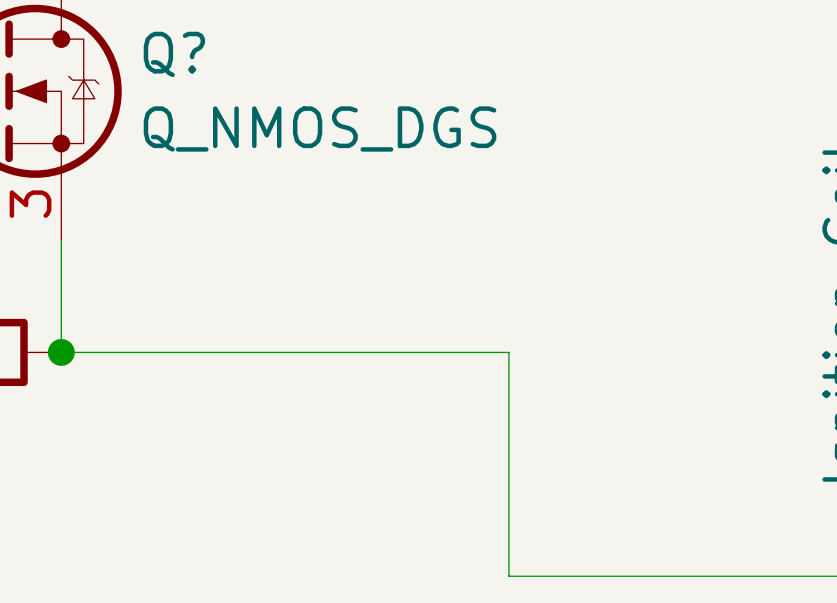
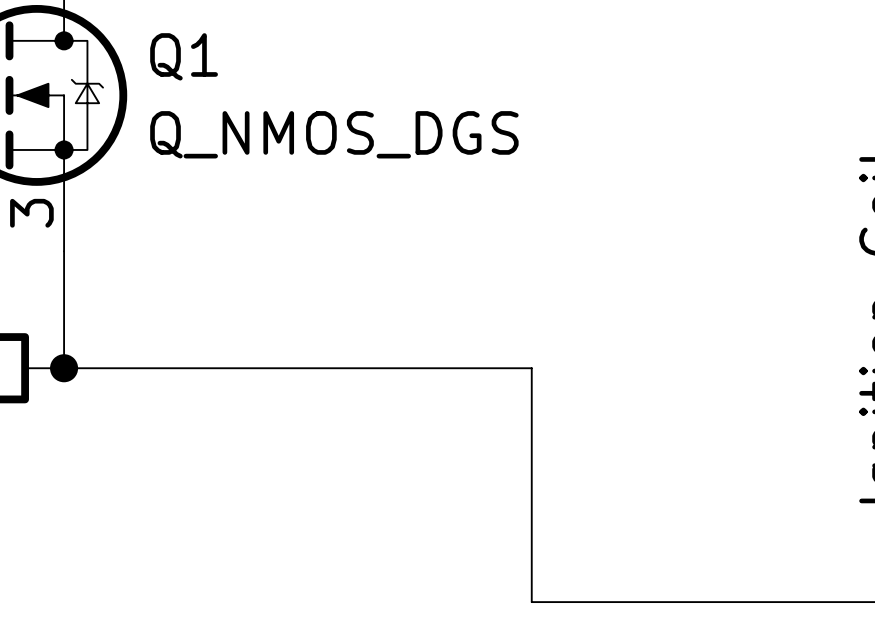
Q? name: Q? (174, 54) -> Q1 (184, 56)

